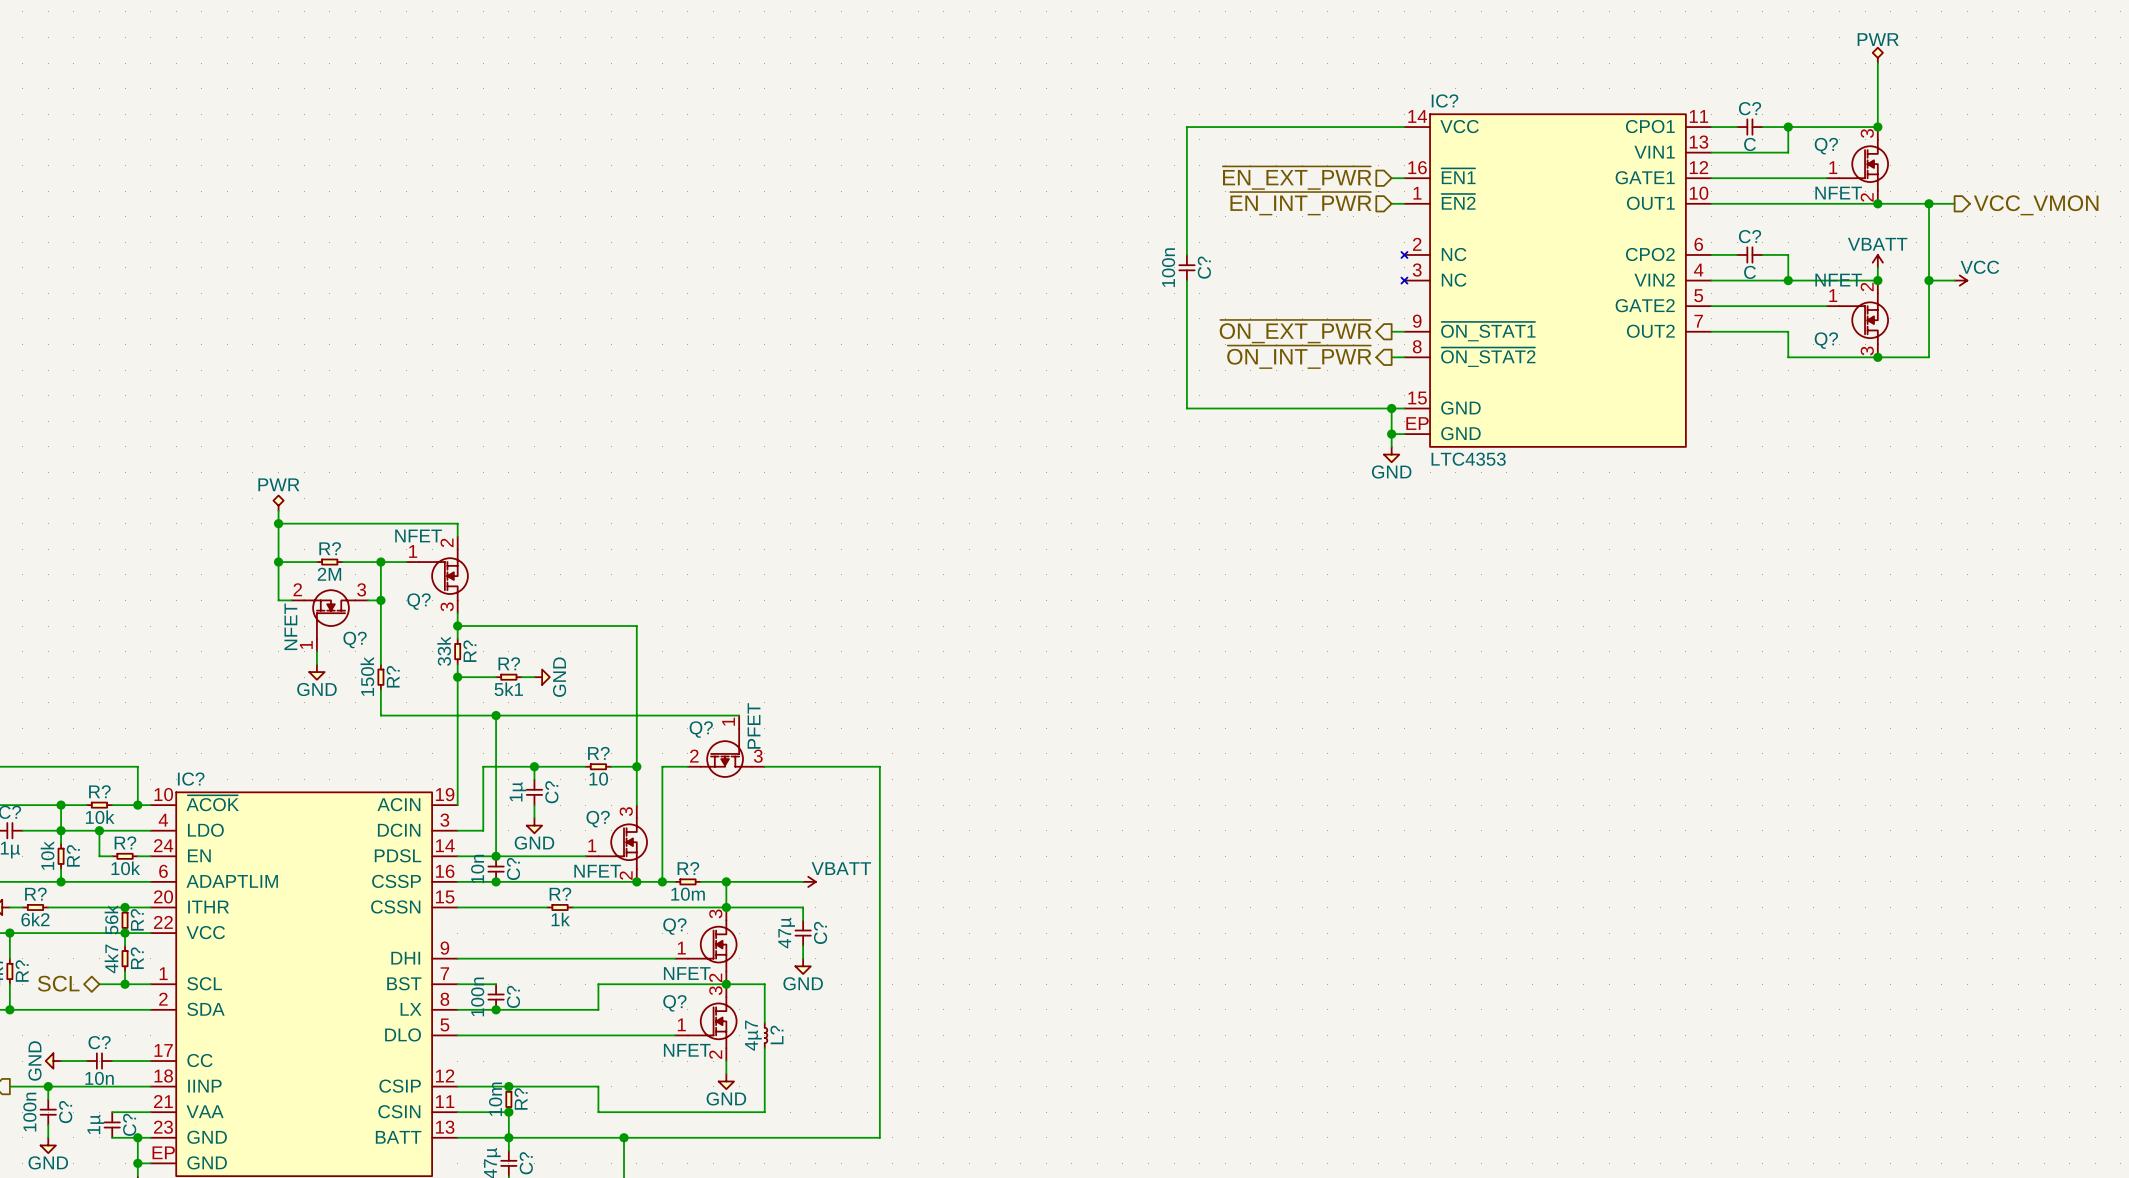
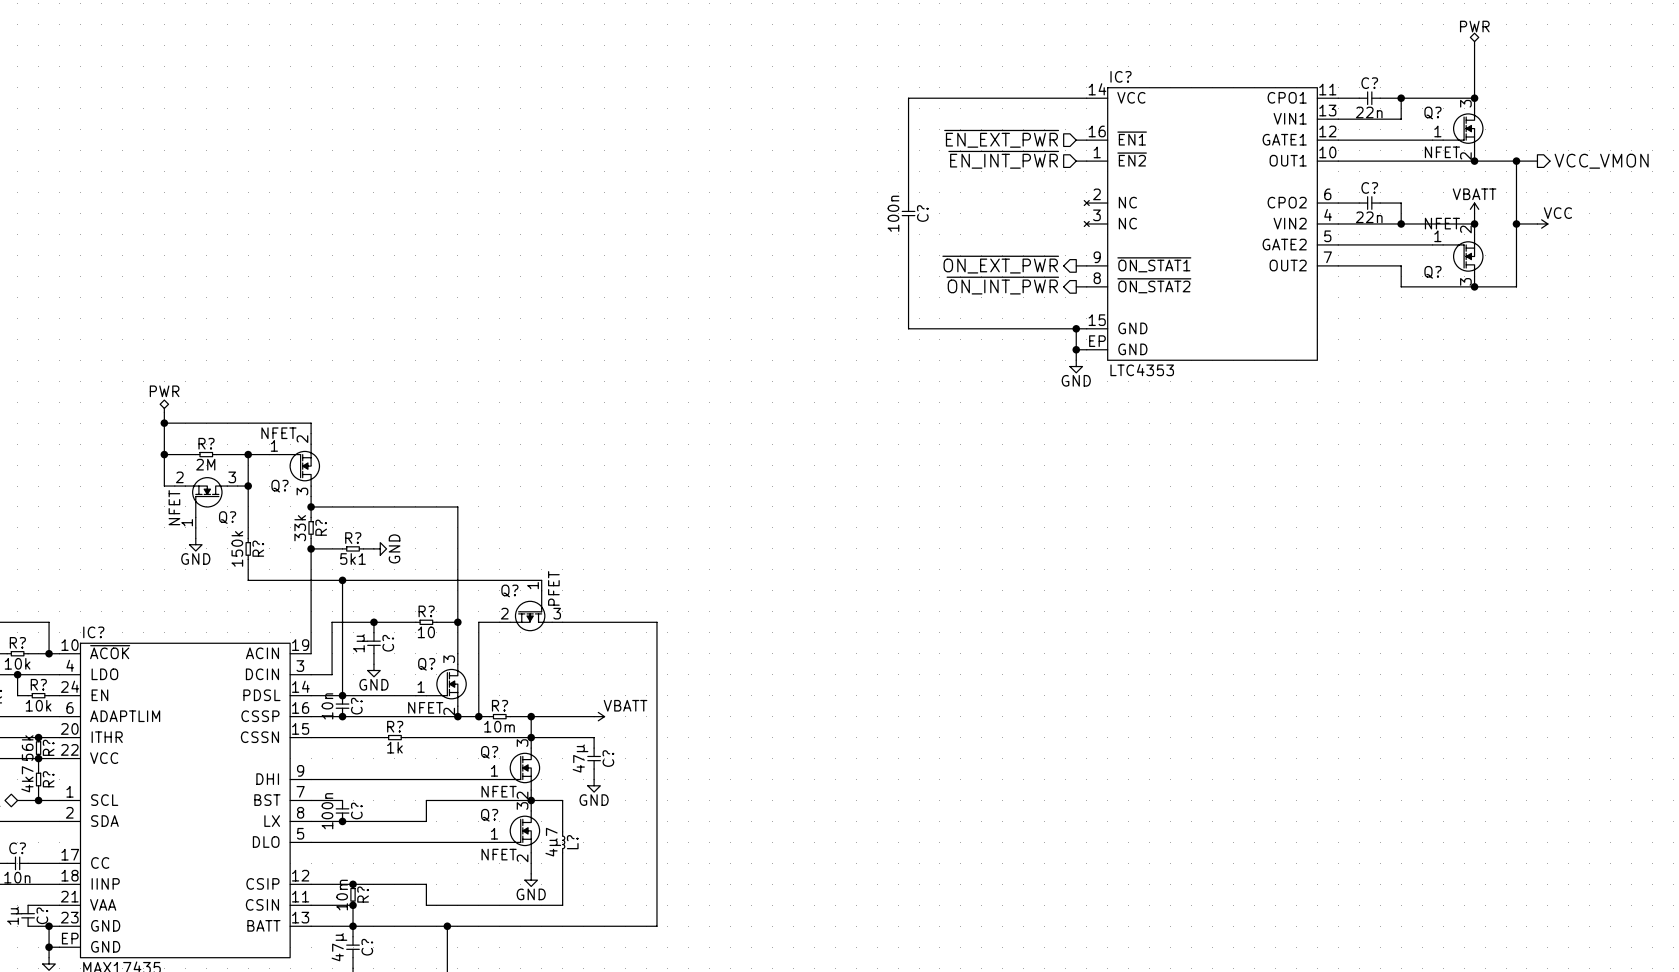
C? value: C (1750, 144) -> 22n (1369, 112)
C? value: C (1750, 272) -> 22n (1369, 217)

